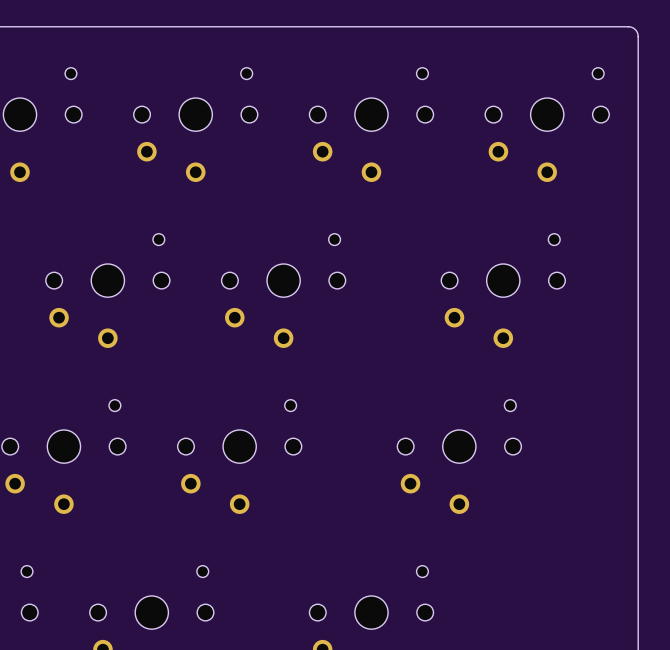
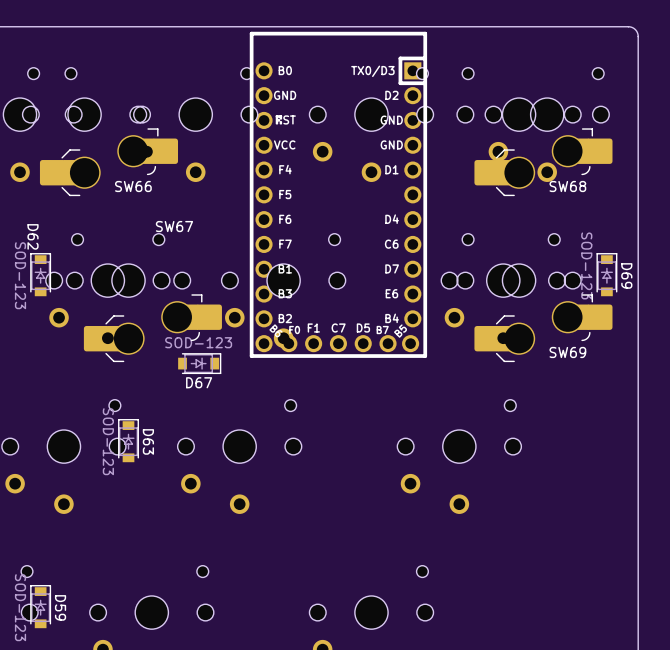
SW66: none -> (100, 131)
SW68: none -> (534, 131)
part: none -> (338, 194)
D62: none -> SOD-123 (40, 274)
D69: none -> SOD-123 (606, 274)
SW67: none -> (144, 297)
SW69: none -> (534, 297)
D67: none -> SOD-123 (199, 363)
D63: none -> SOD-123 (128, 440)
D59: none -> SOD-123 (40, 606)

